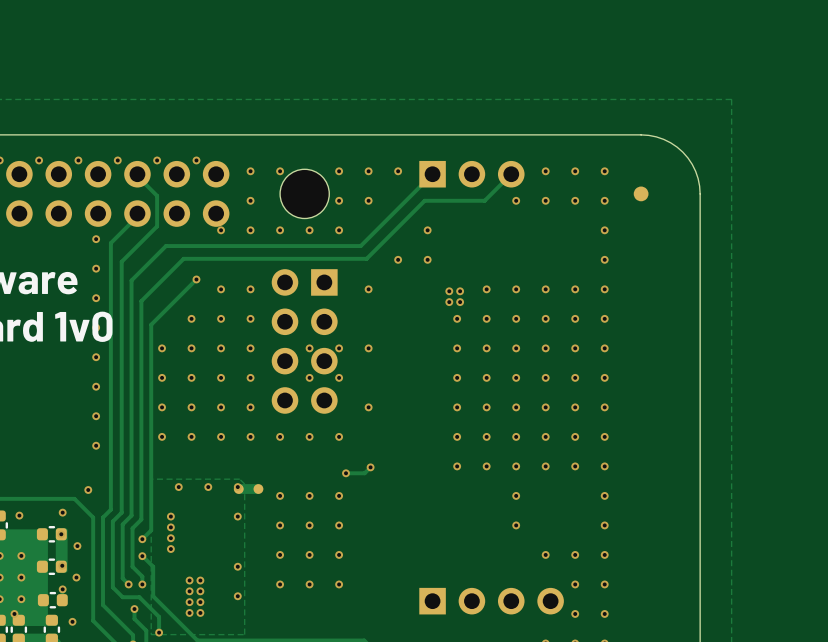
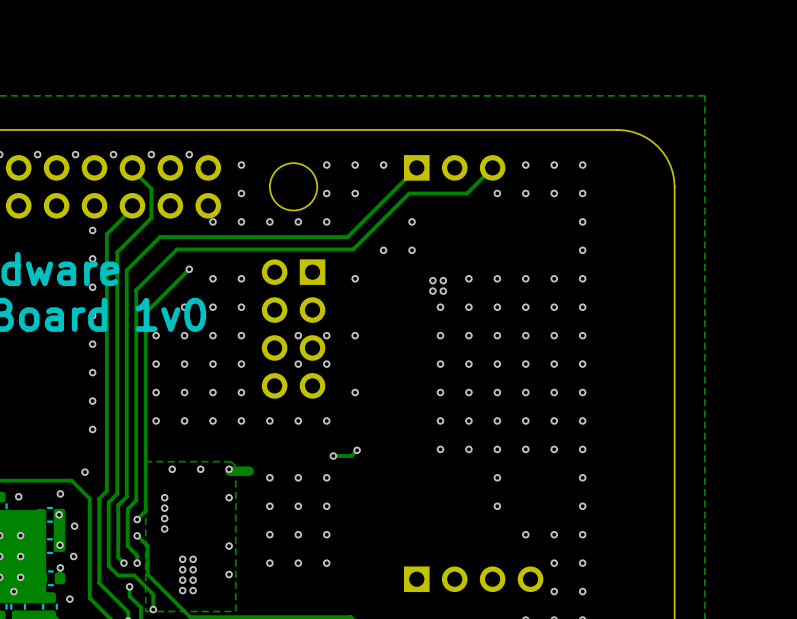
via: (280, 171) -> none
part: (641, 193) -> none

